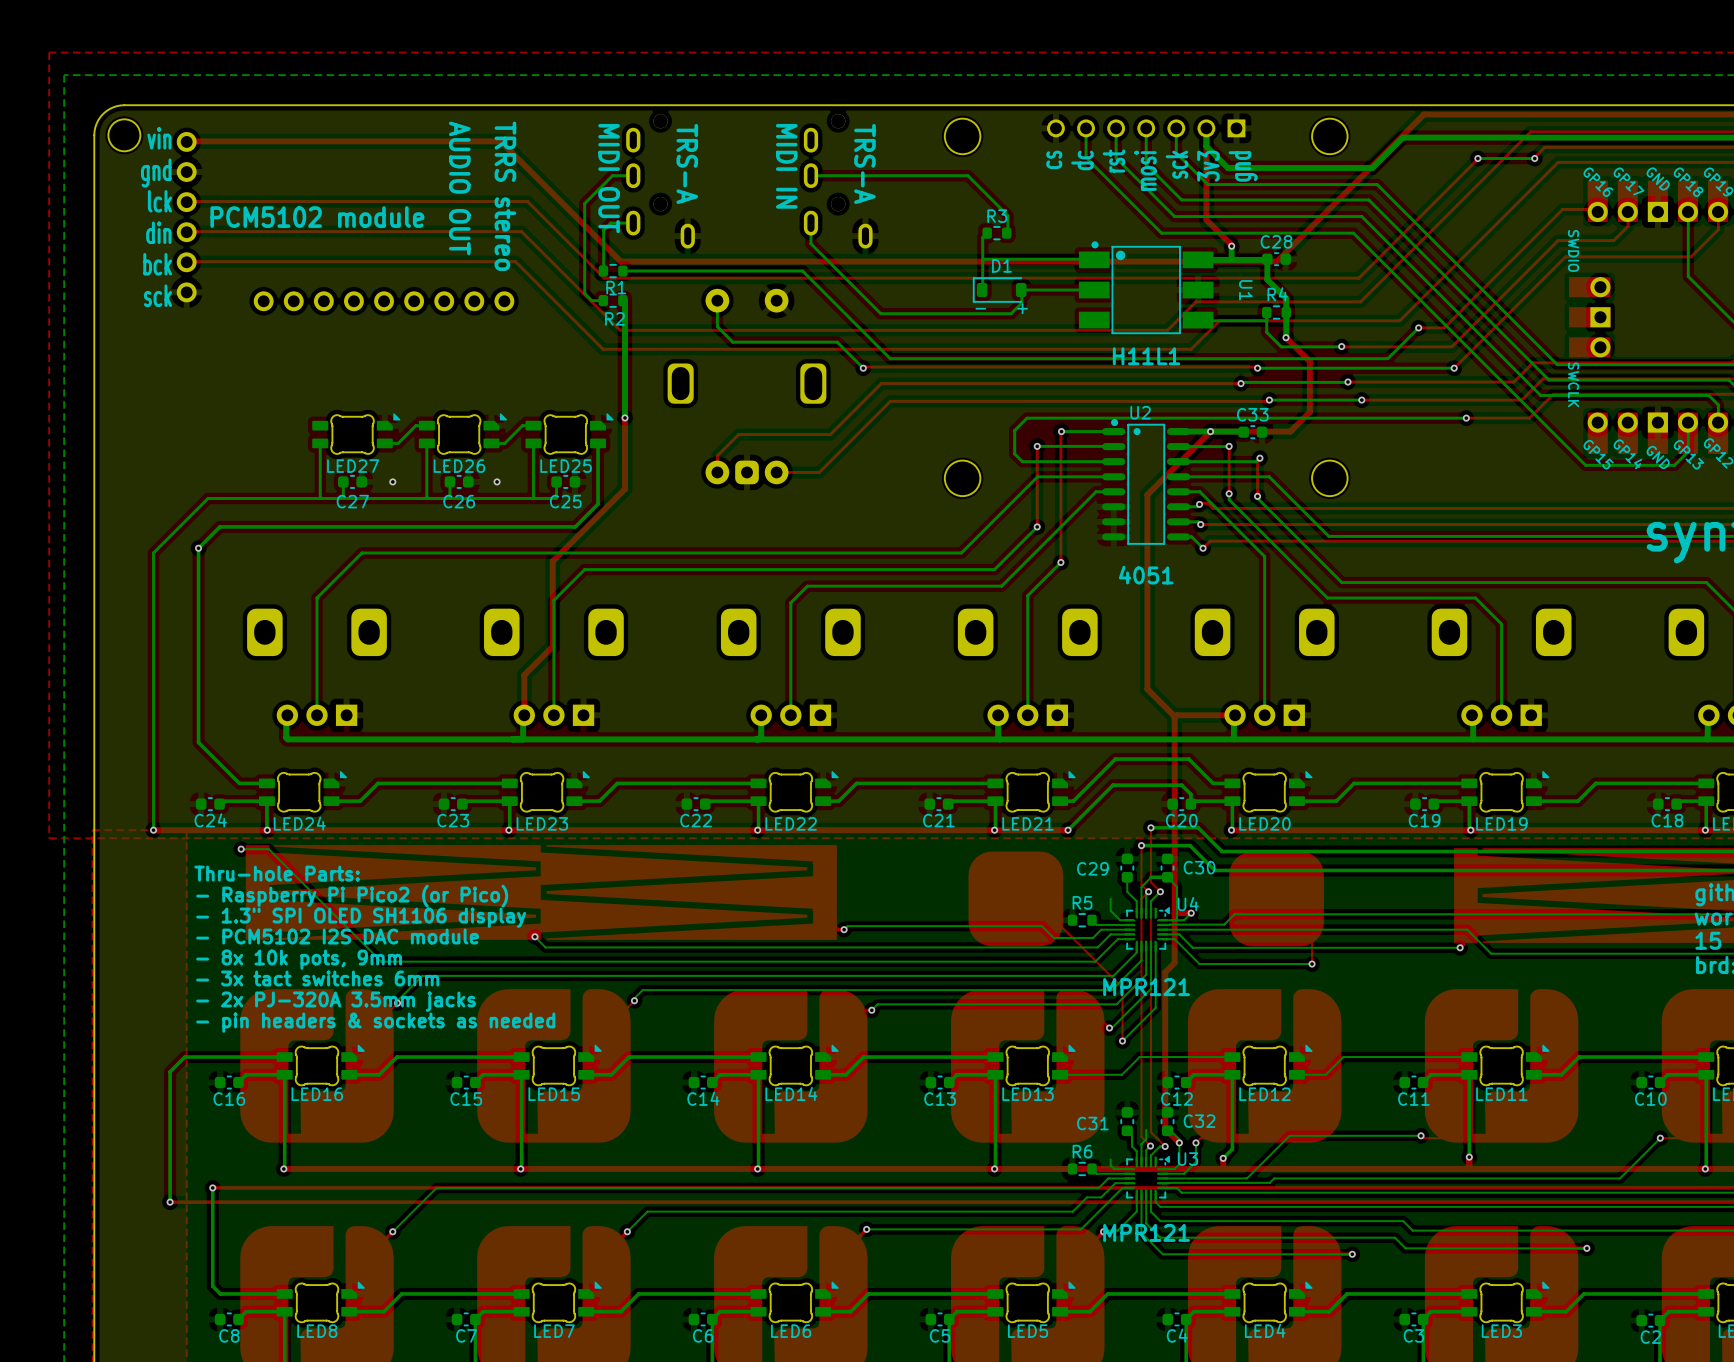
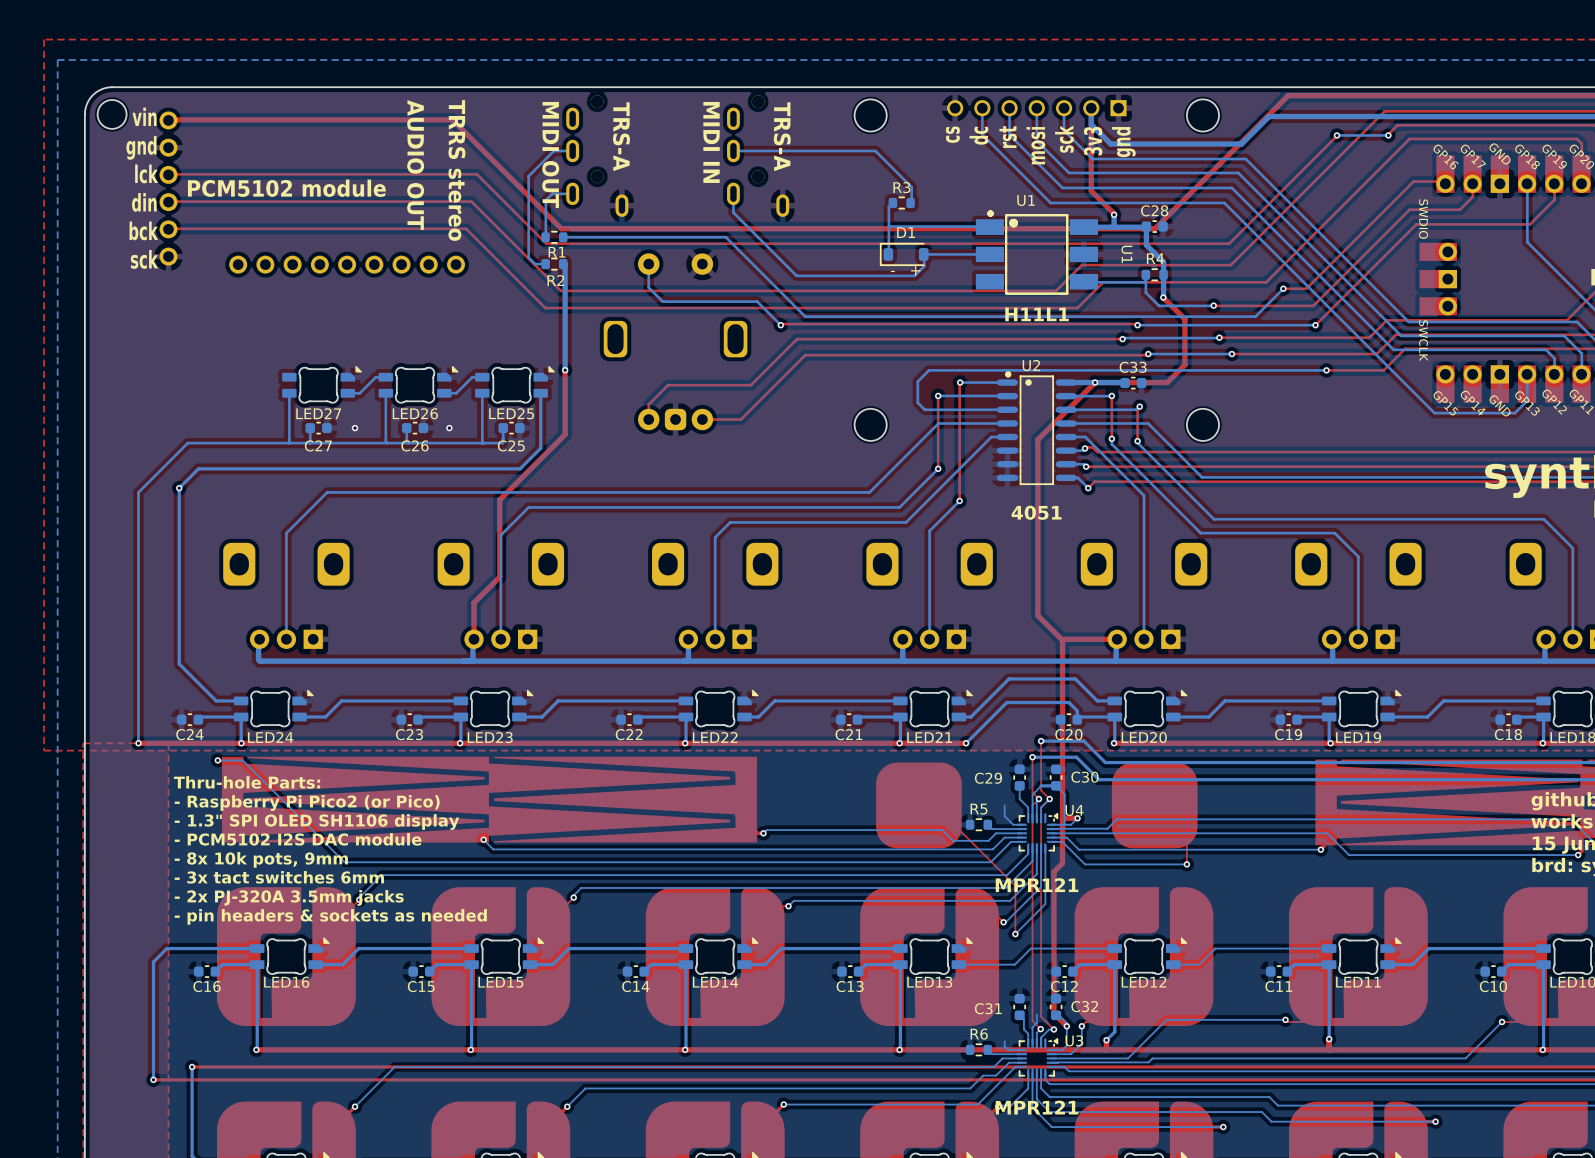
U1: none -> (1036, 252)

